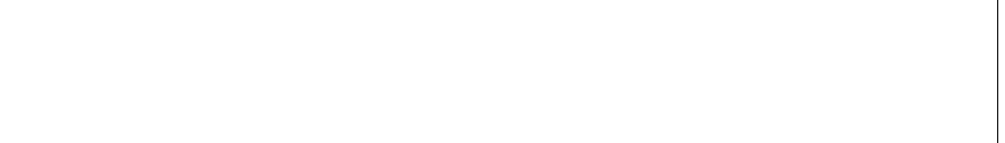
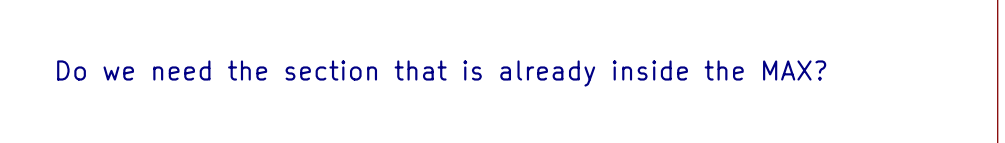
text: none -> Do we need the section that is already inside the MAX? (441, 73)

